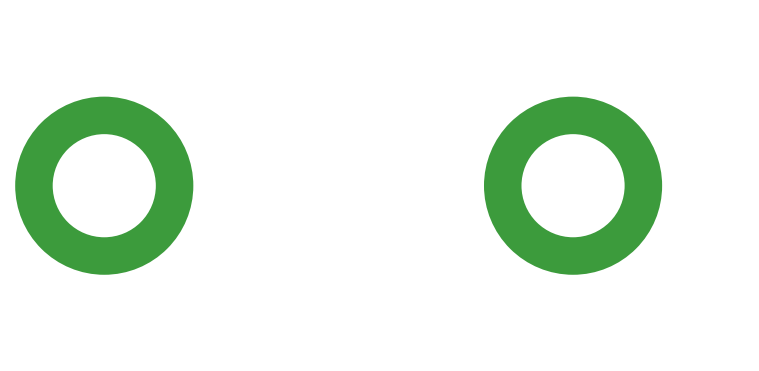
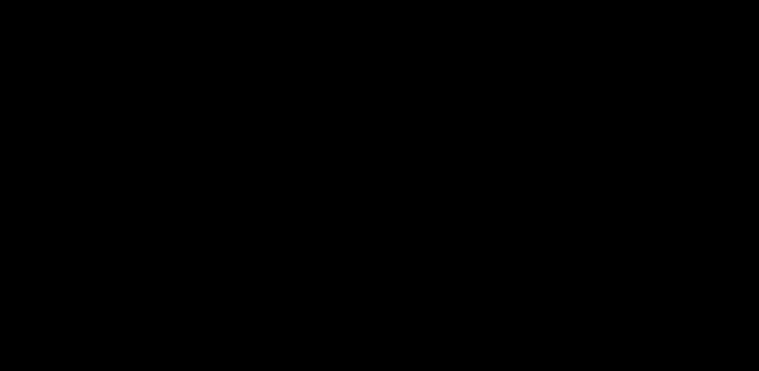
part: (104, 185) -> none
part: (573, 185) -> none

